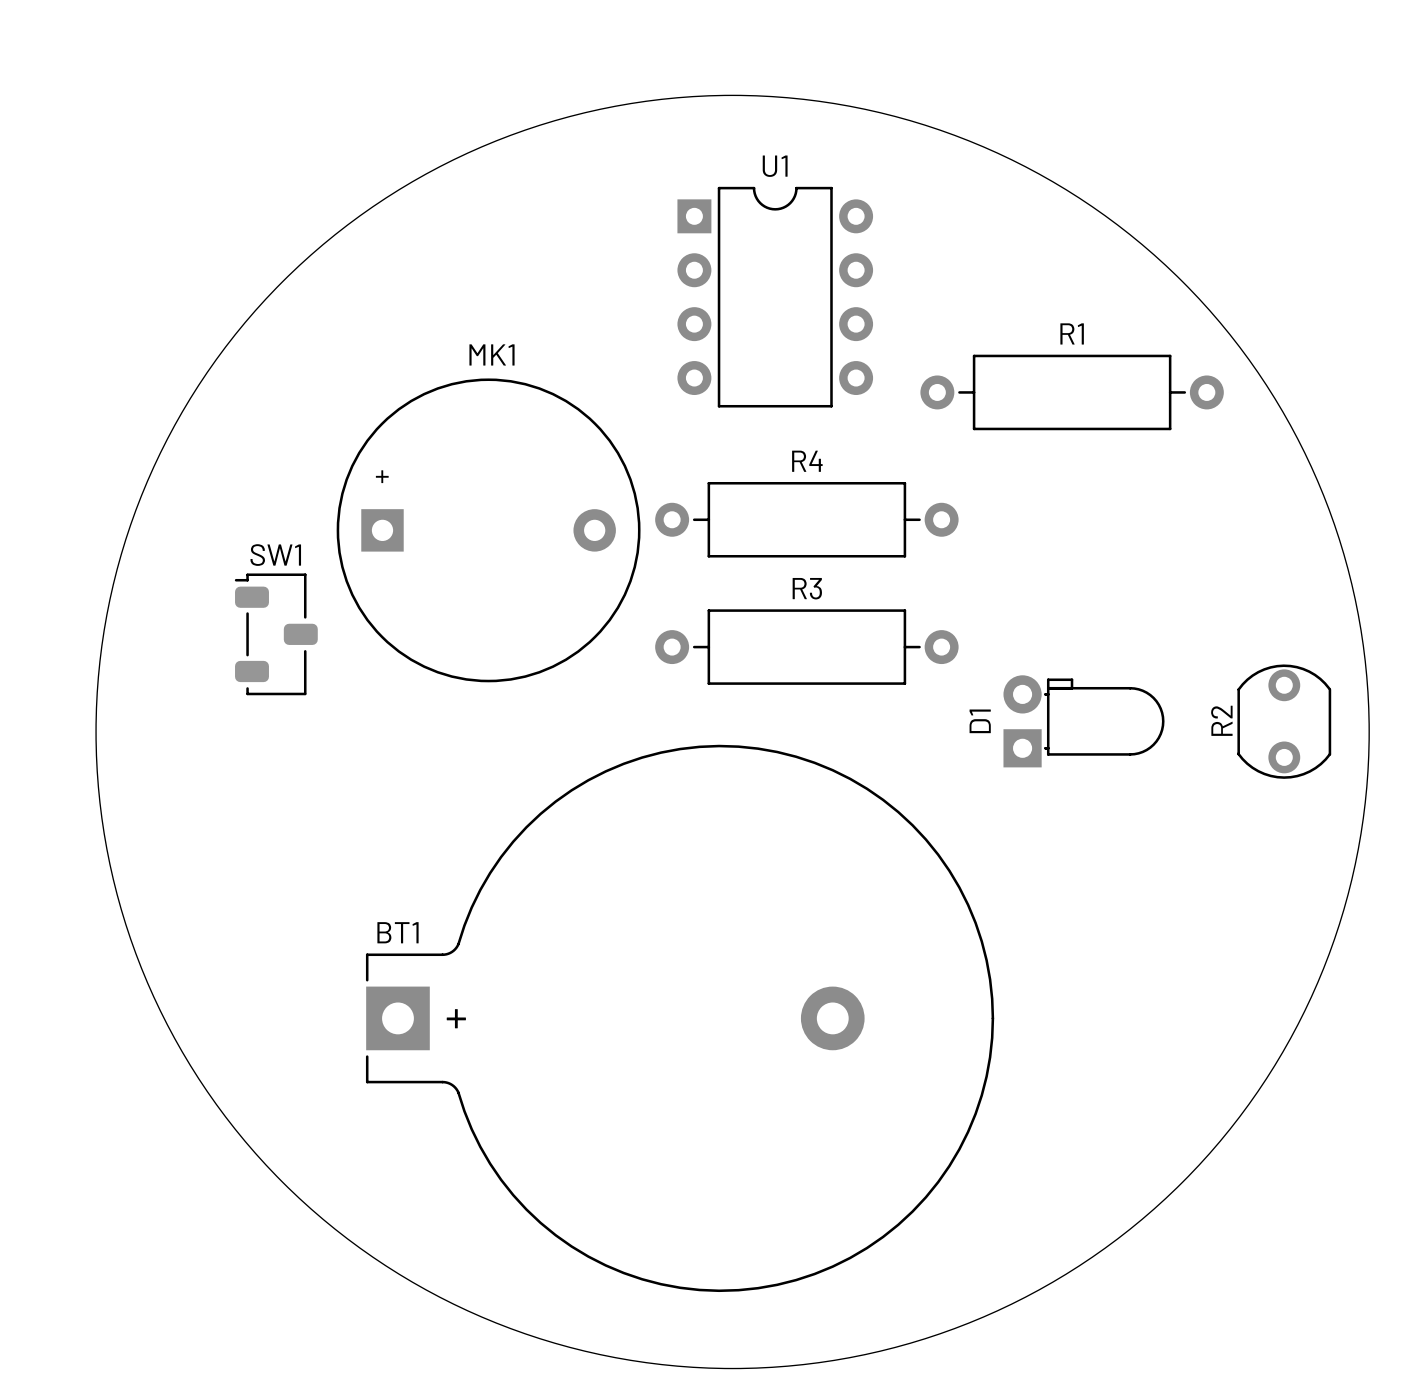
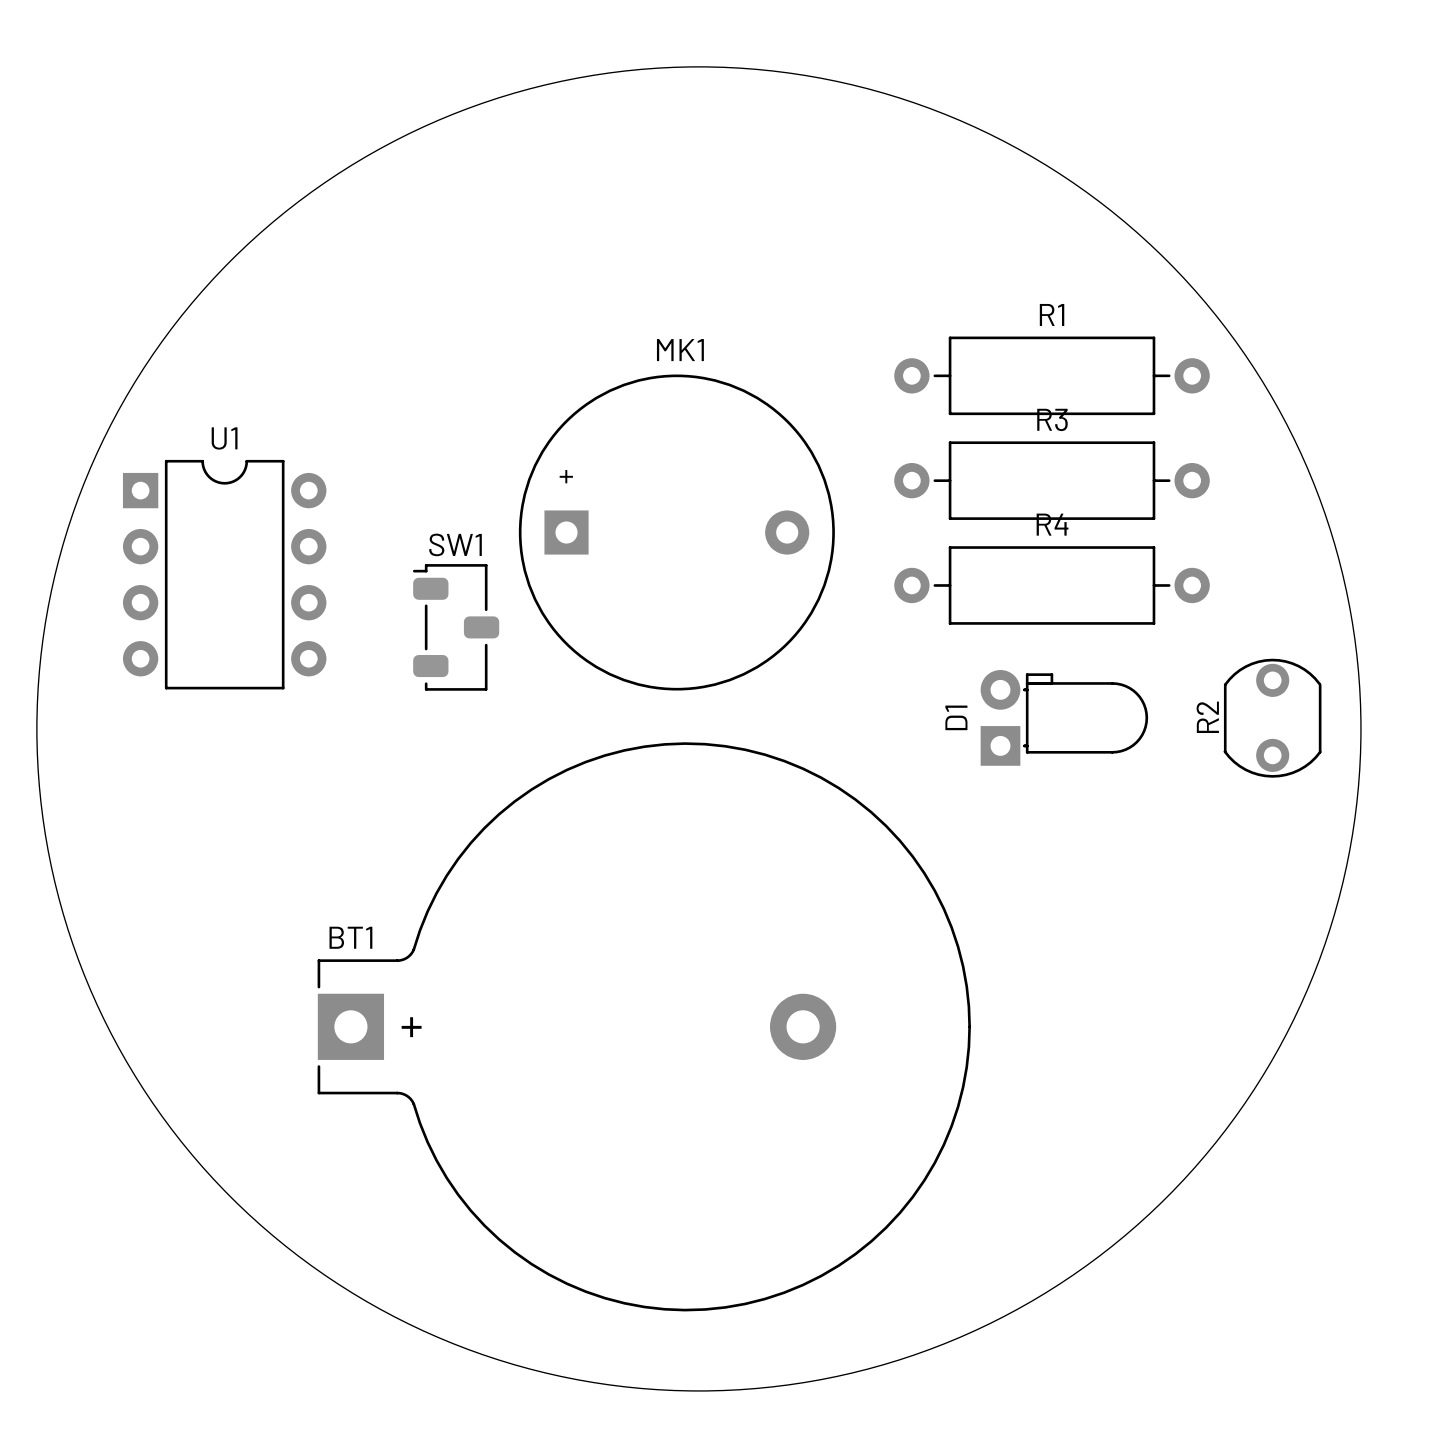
U1 position: (775, 297) -> (224, 574)
R4 position: (806, 519) -> (1052, 585)
MK1 position: (488, 530) -> (676, 532)
SW1 position: (276, 634) -> (456, 627)
R3 position: (806, 647) -> (1052, 480)

